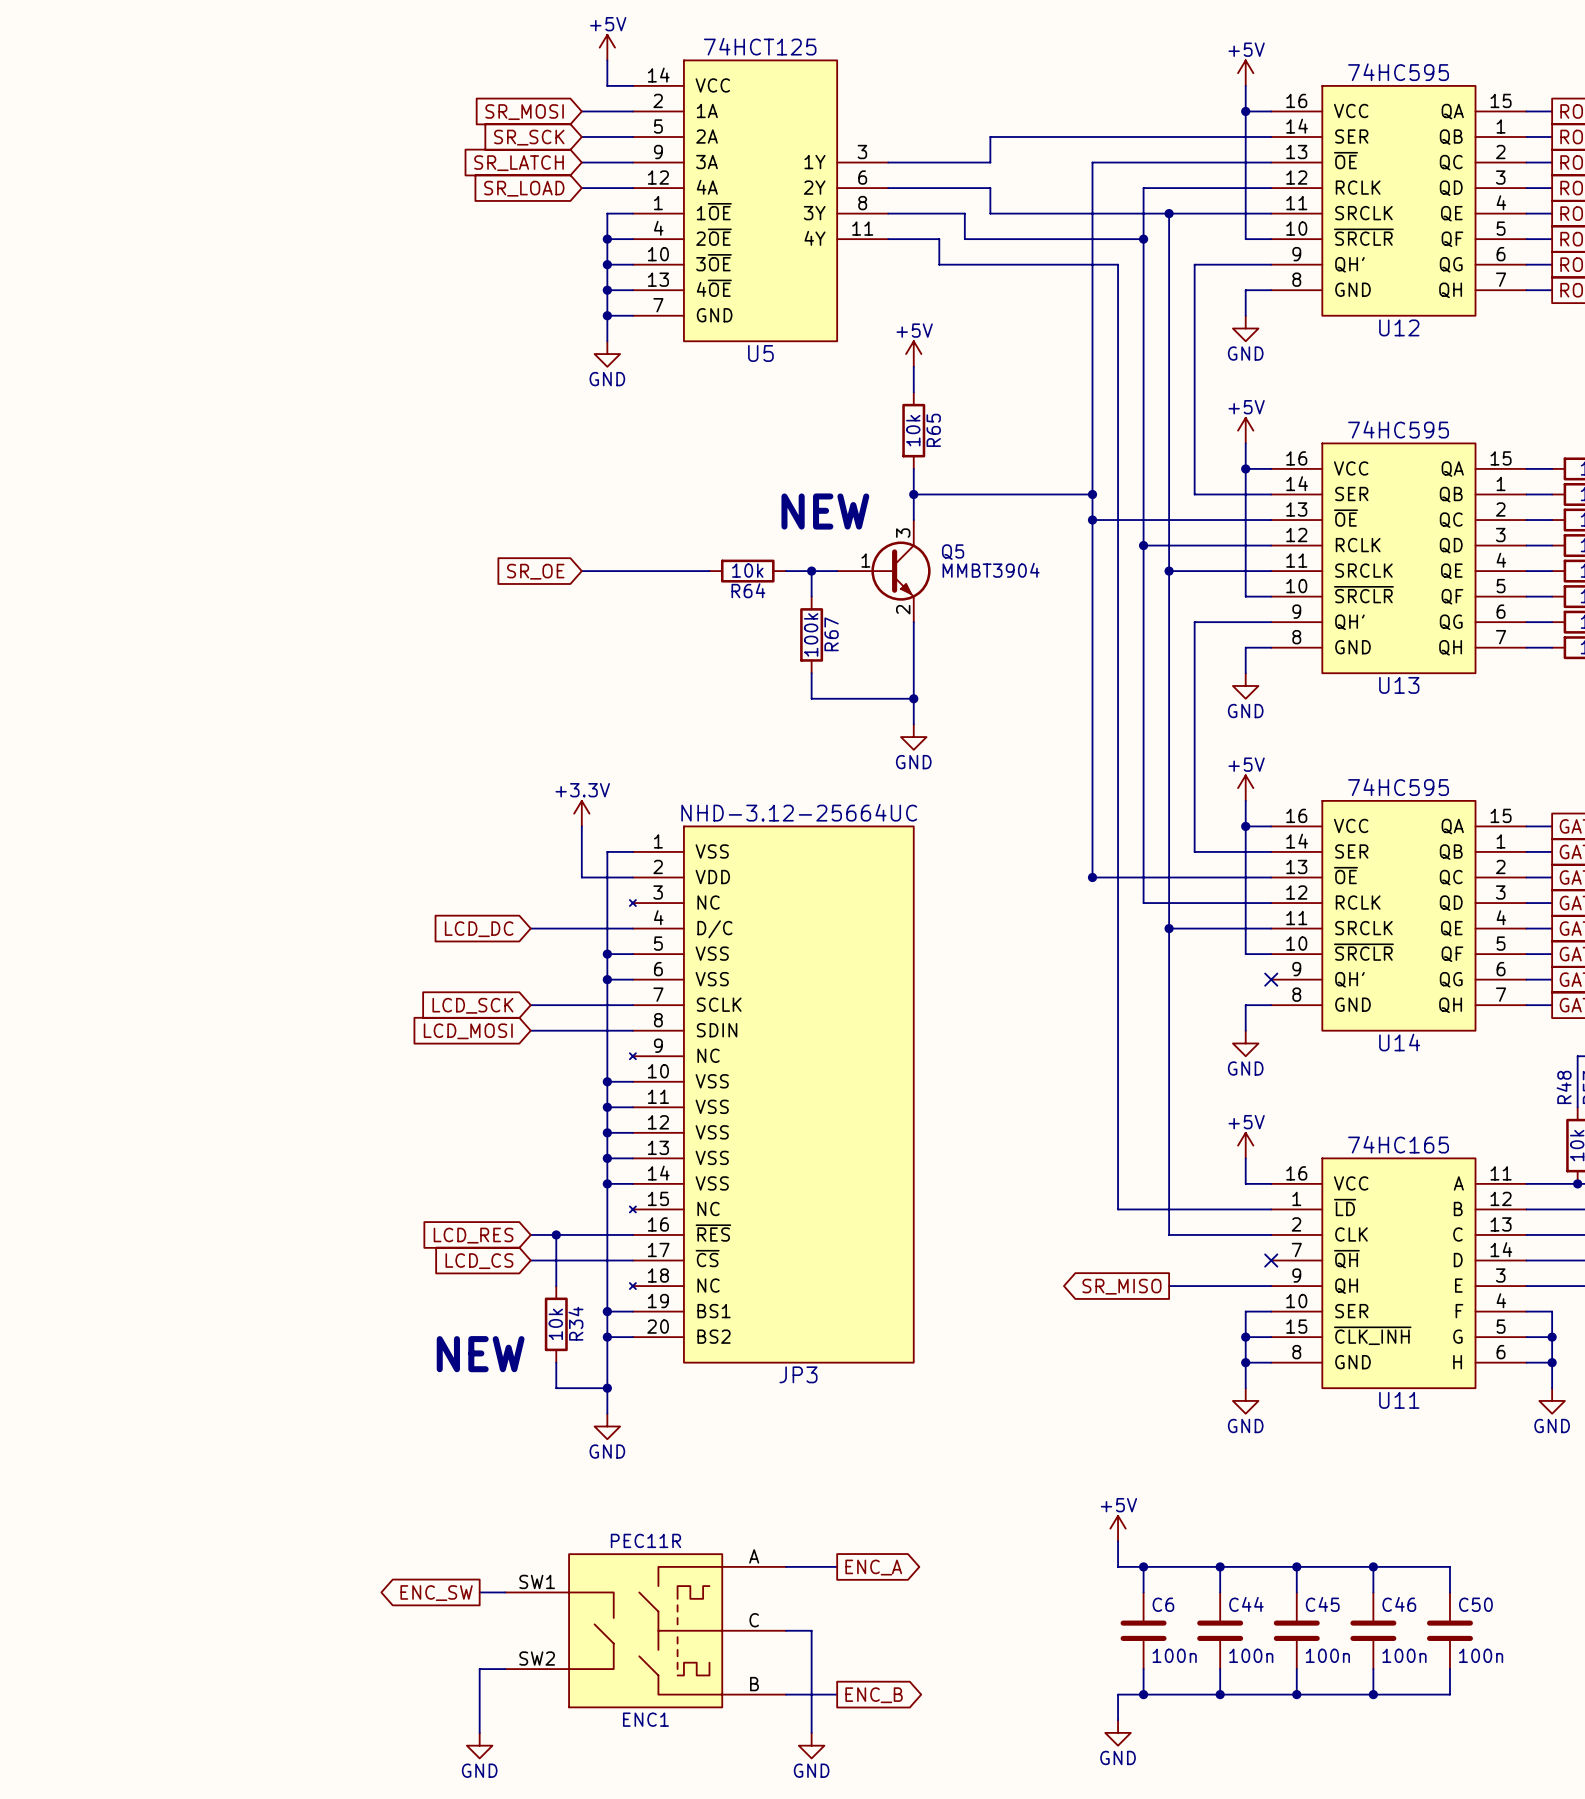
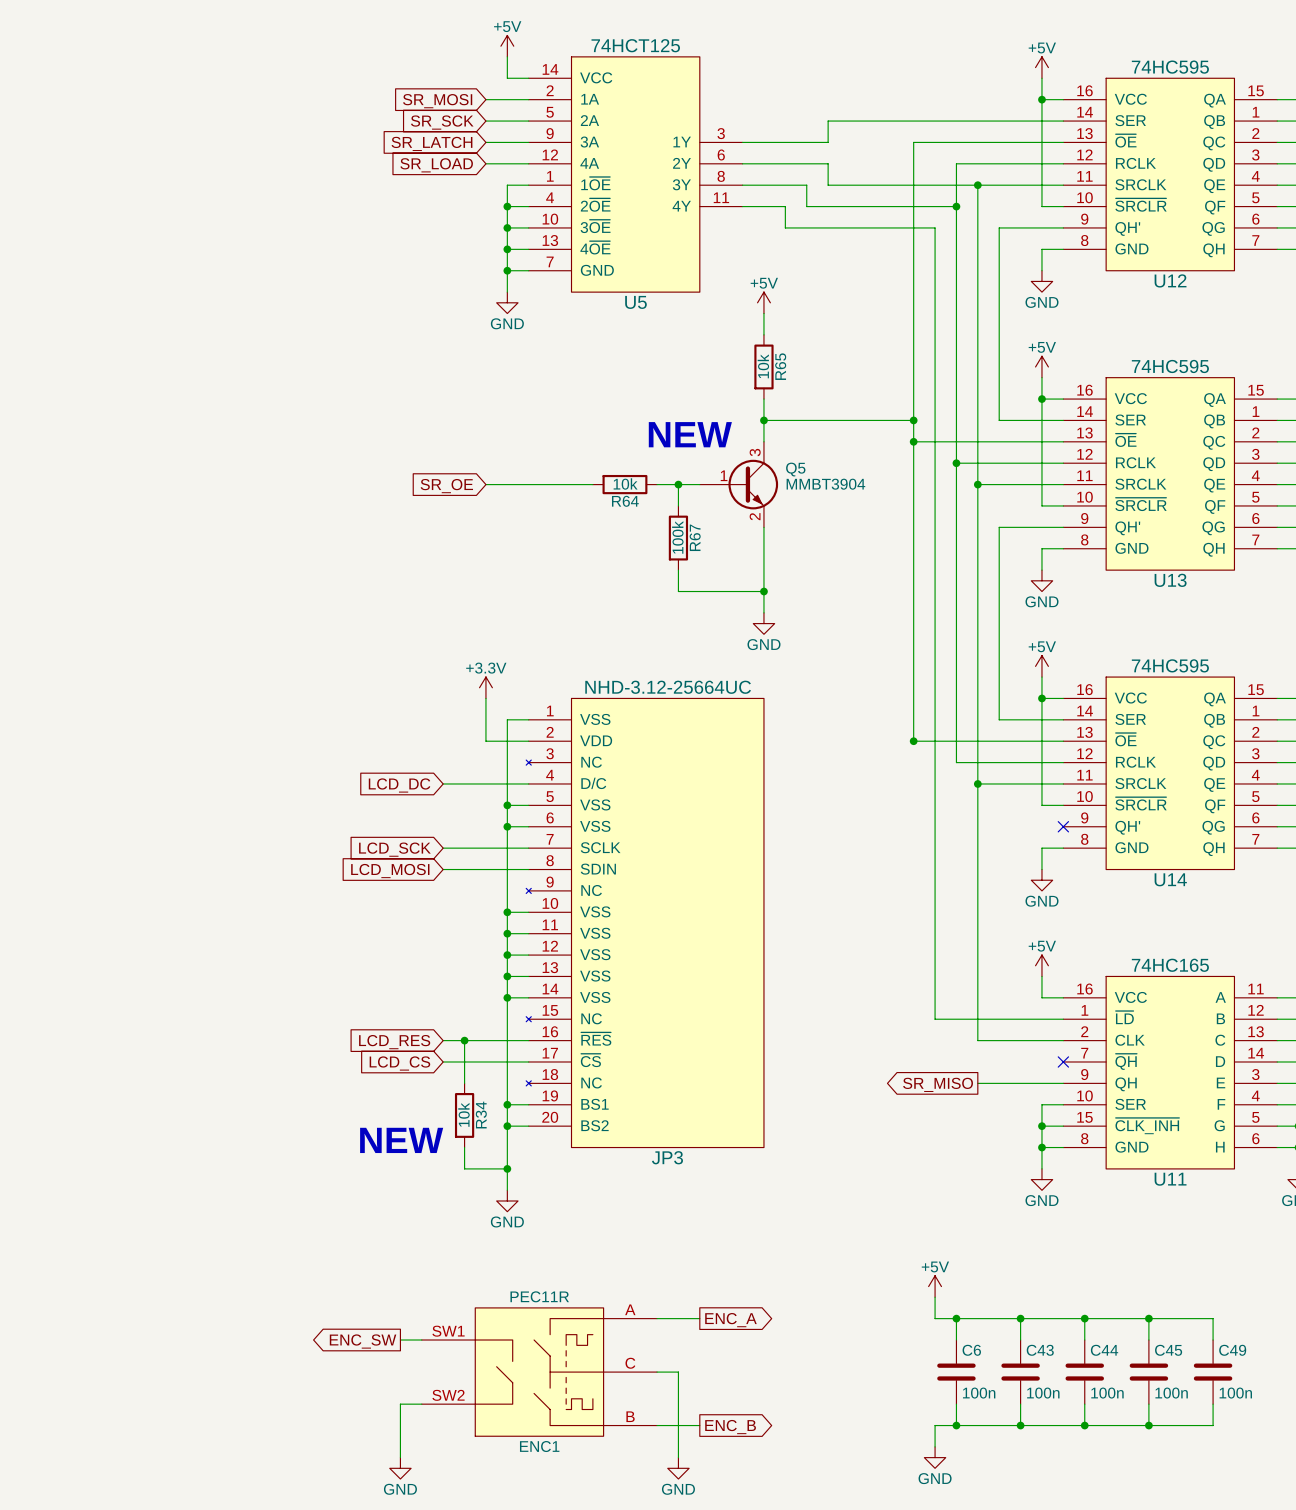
C44 name: C44 (1246, 1604) -> C43 (1040, 1350)
C45 name: C45 (1322, 1604) -> C44 (1104, 1350)
C46 name: C46 (1399, 1604) -> C45 (1168, 1350)
C50 name: C50 (1475, 1604) -> C49 (1232, 1350)

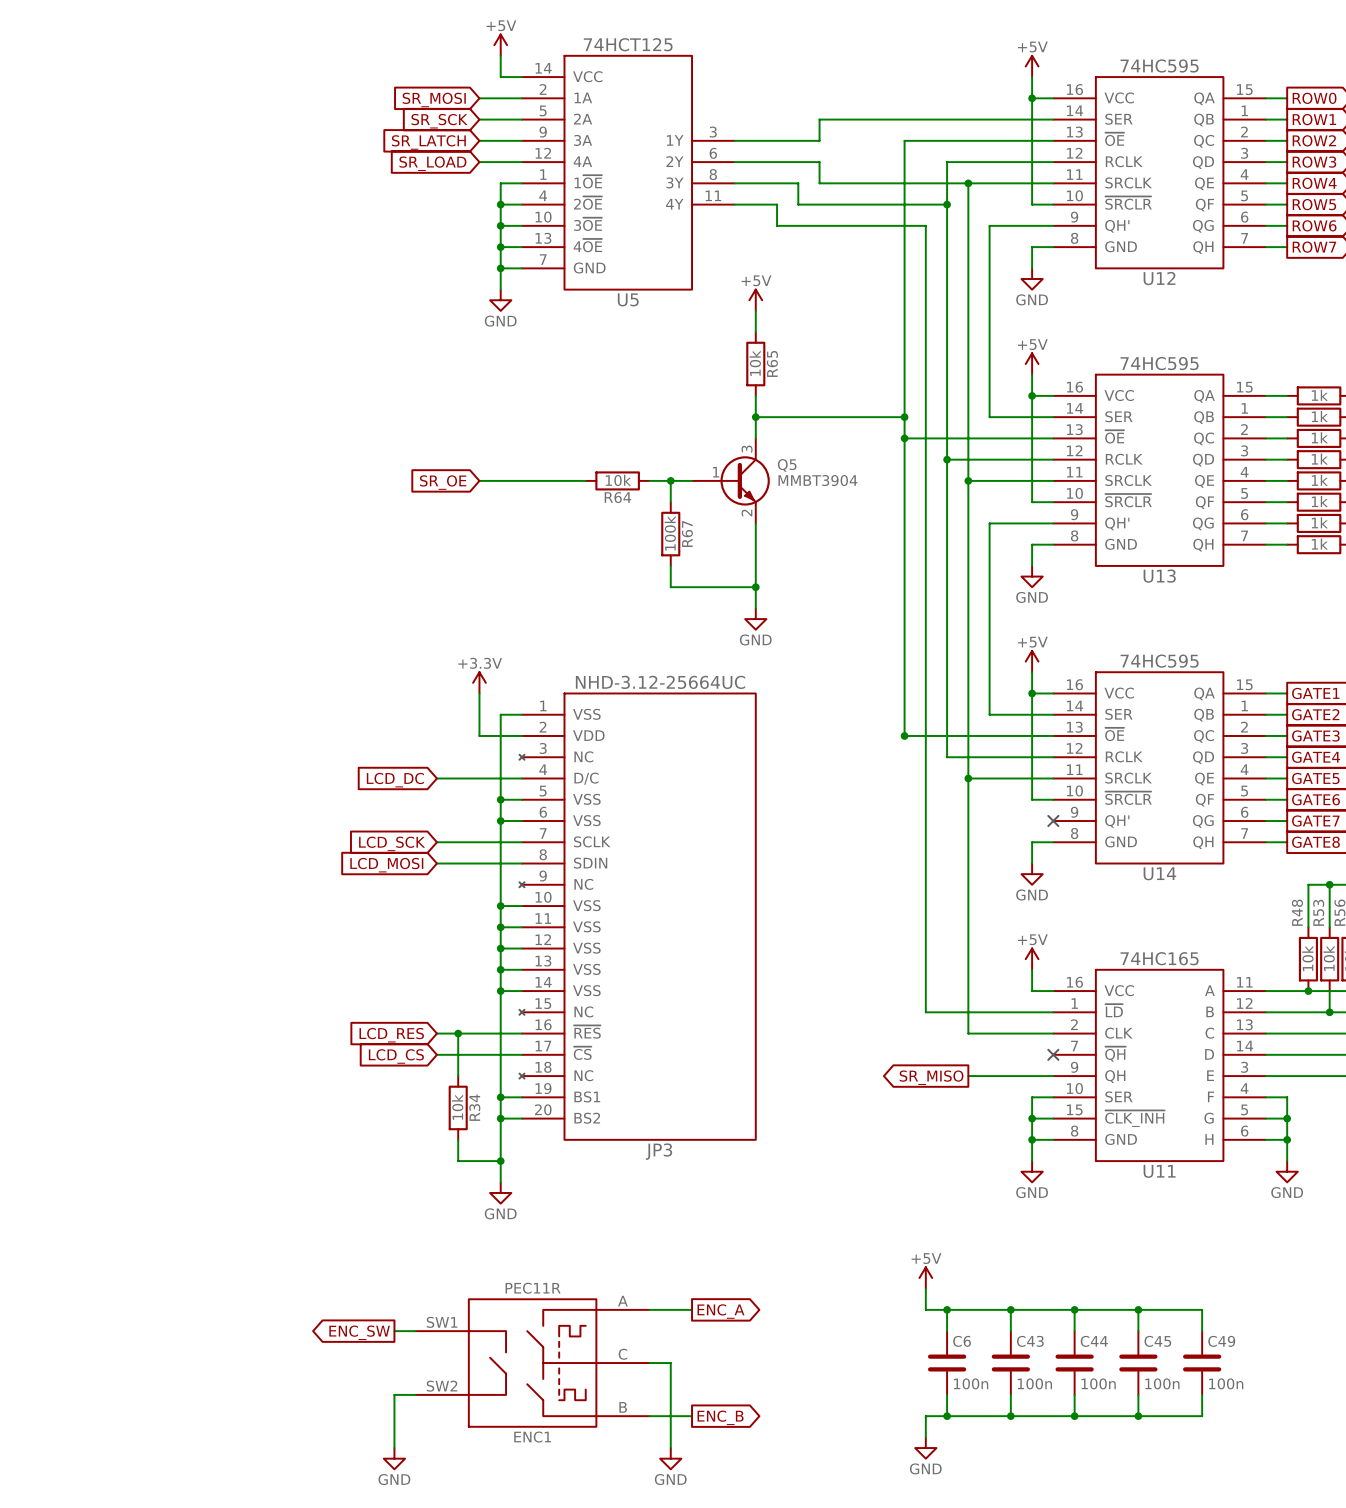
text: NEW (690, 434) -> none
text: NEW (401, 1140) -> none

